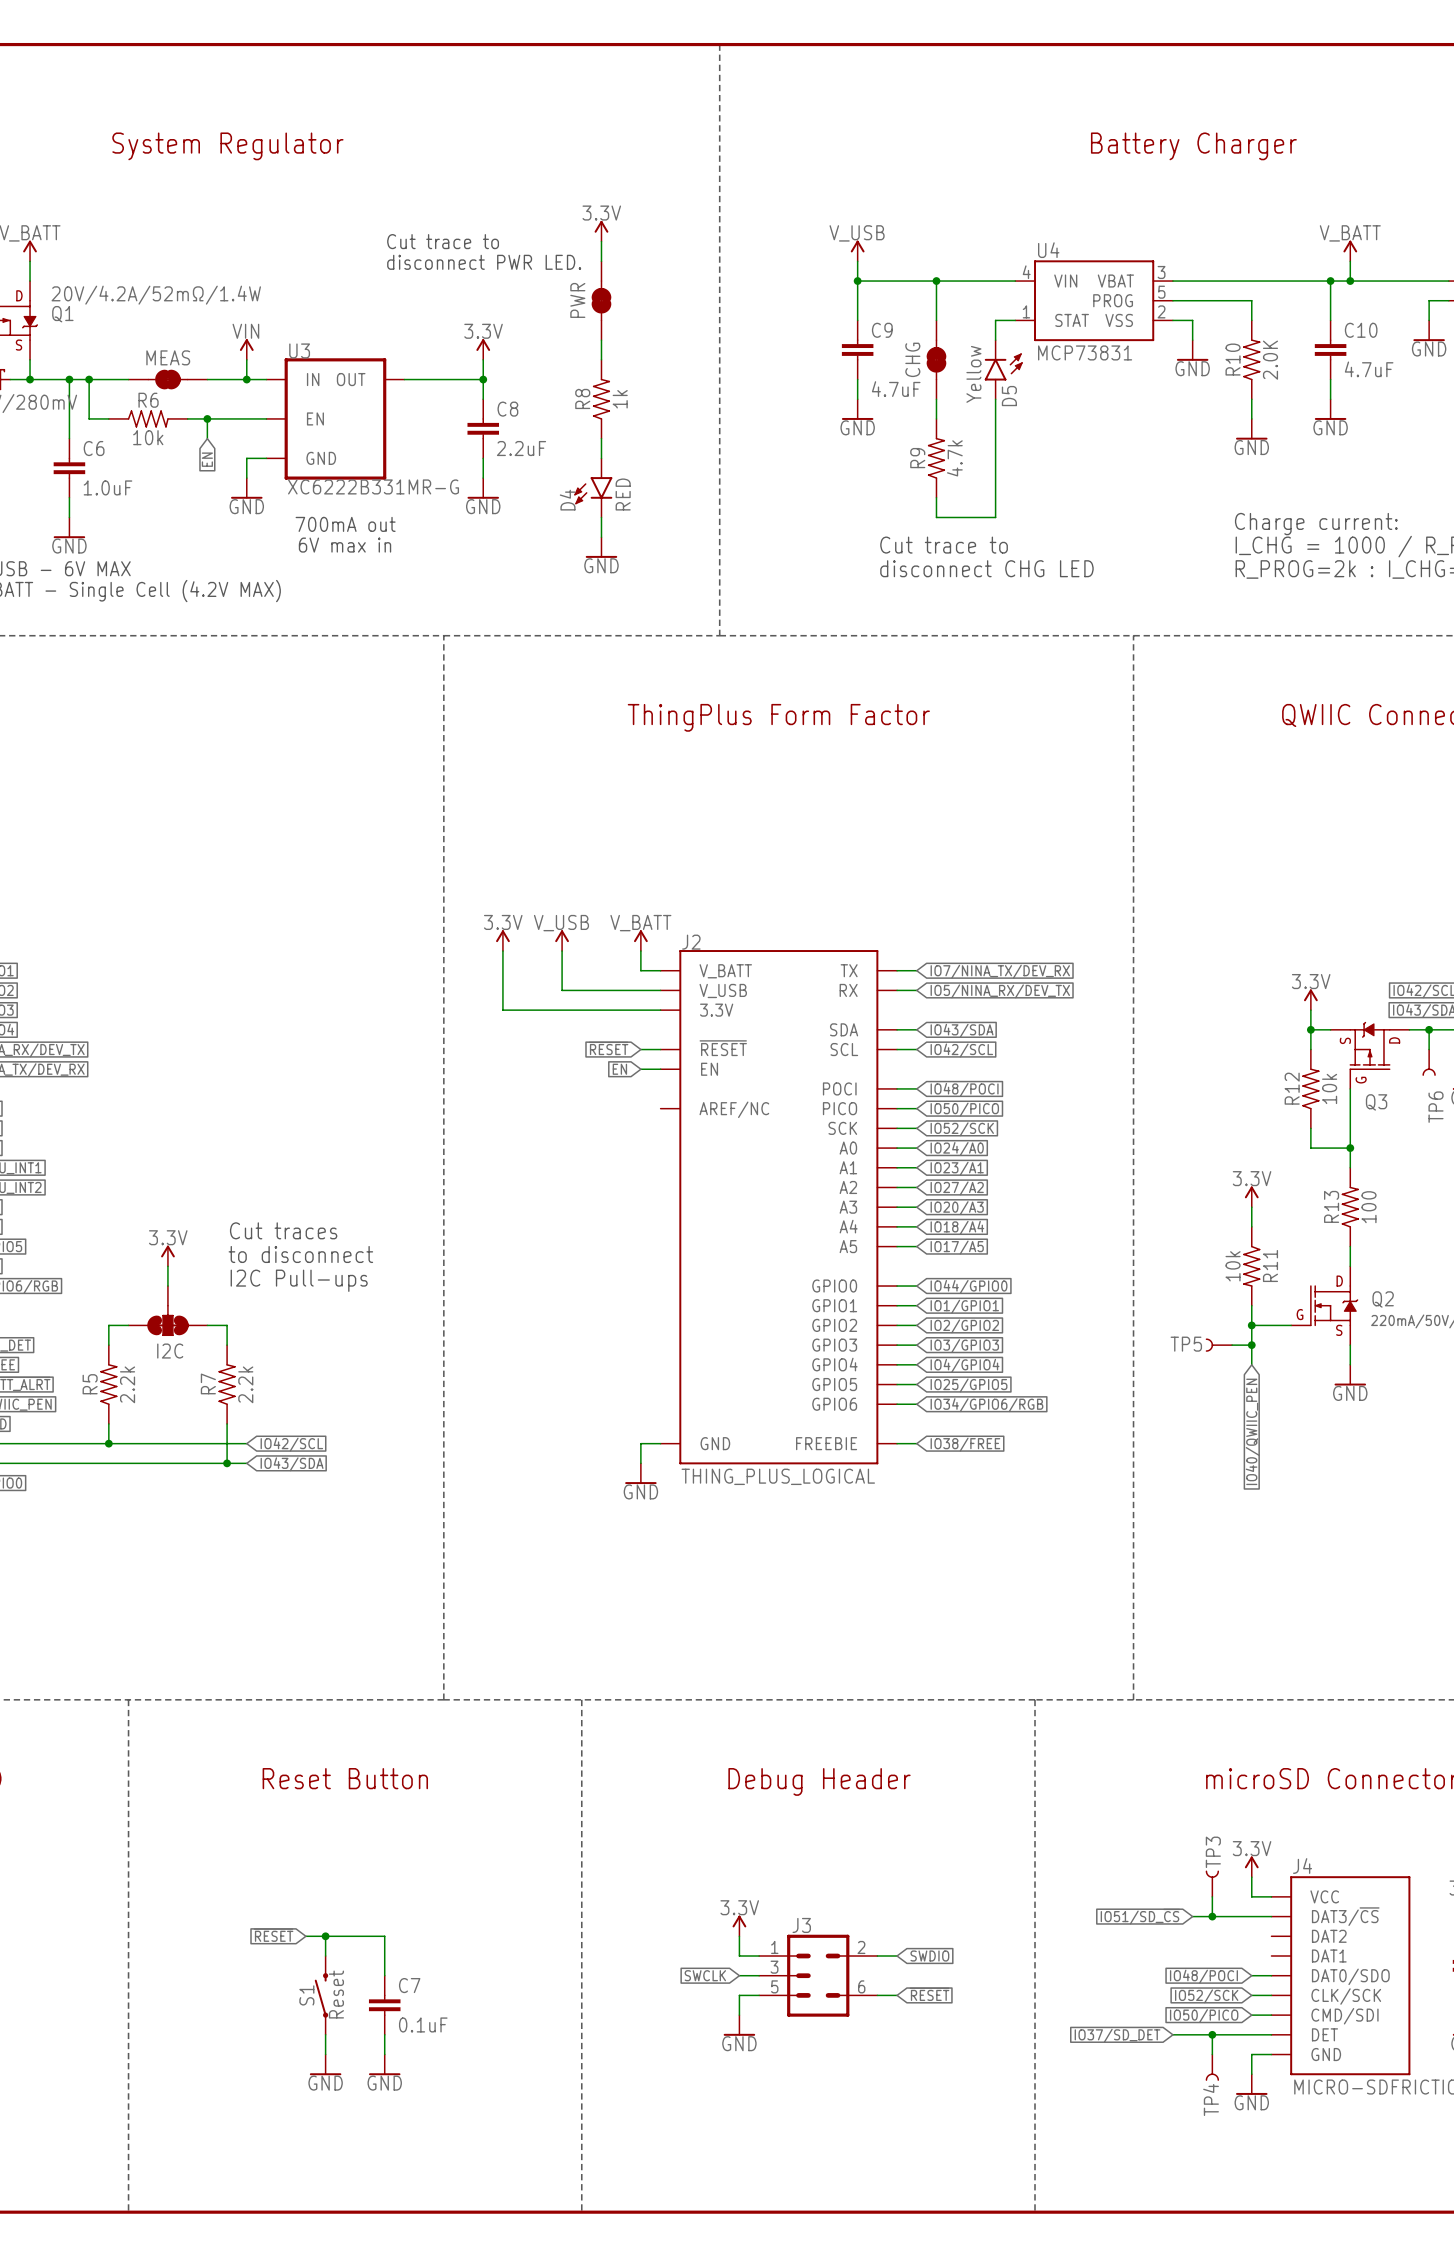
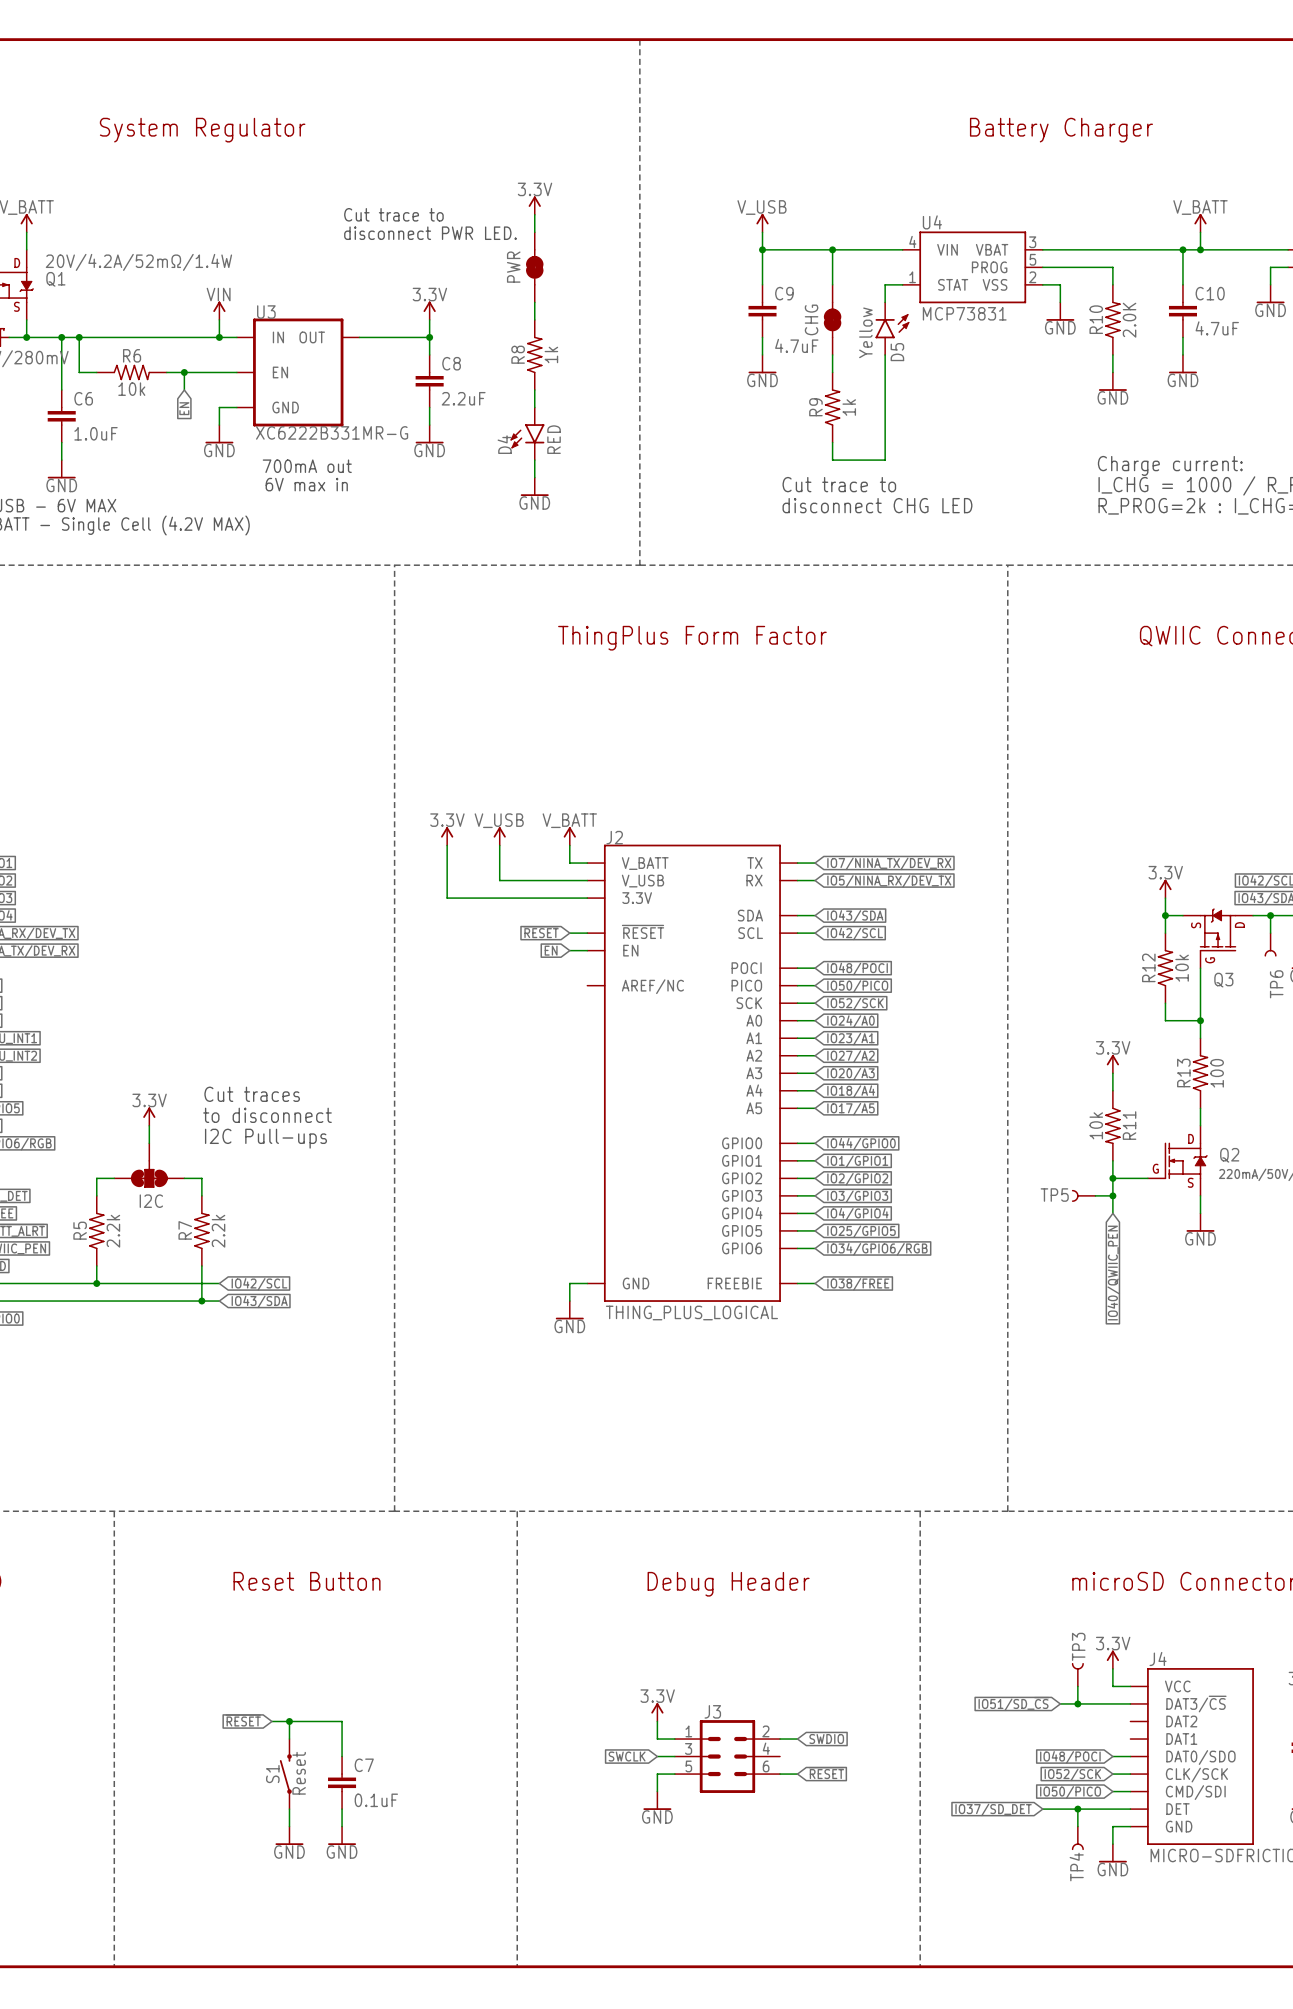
MEAS: (167, 379) -> none
R9 value: 4.7k (954, 458) -> 1k (849, 407)
J3 symbol: [759, 1934, 878, 2017] -> [674, 1720, 781, 1793]

